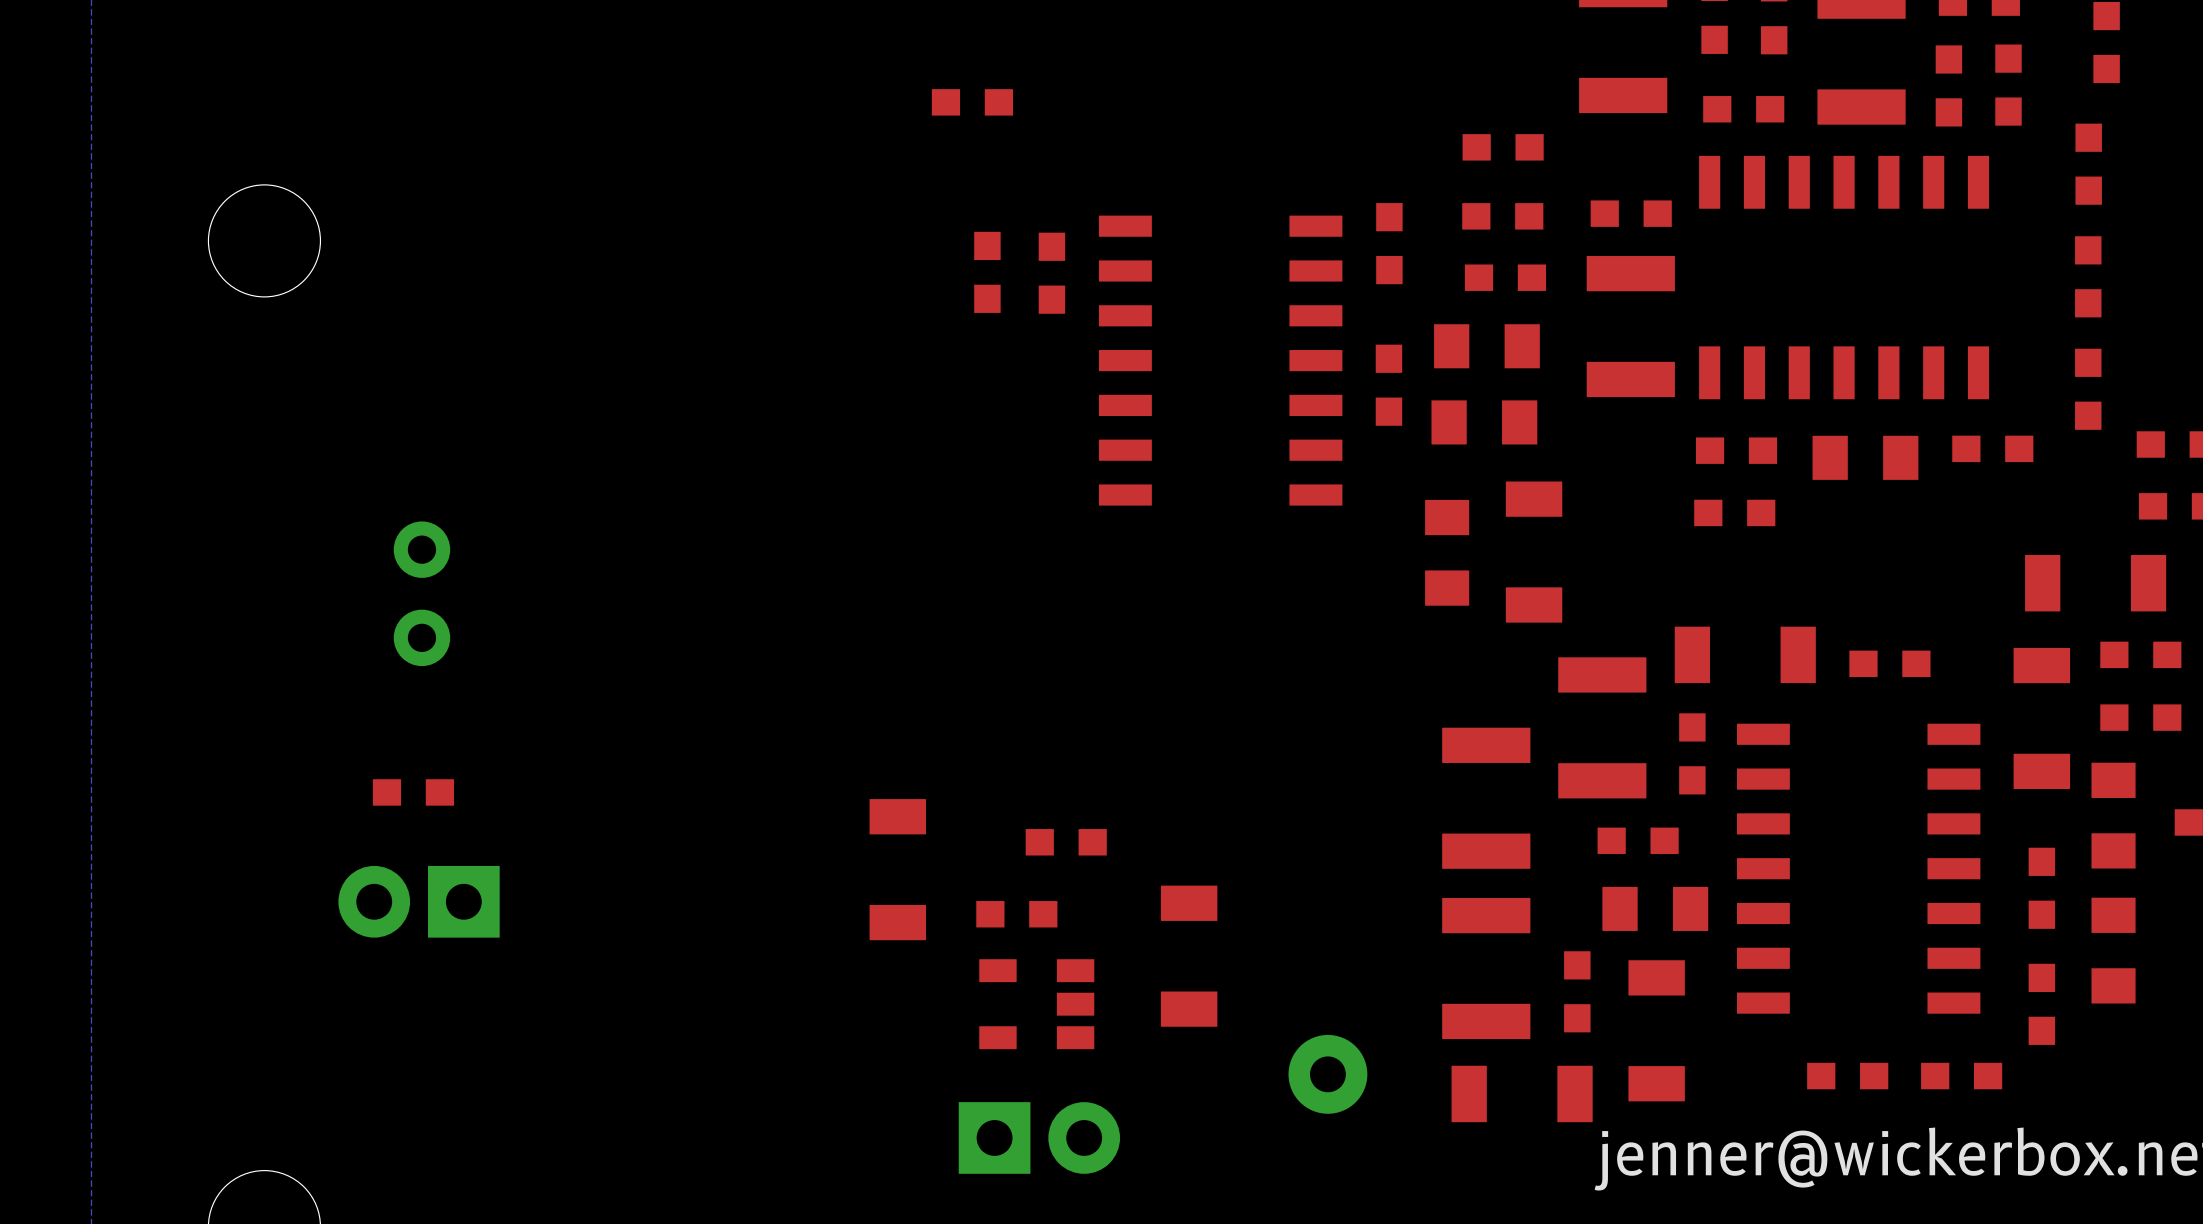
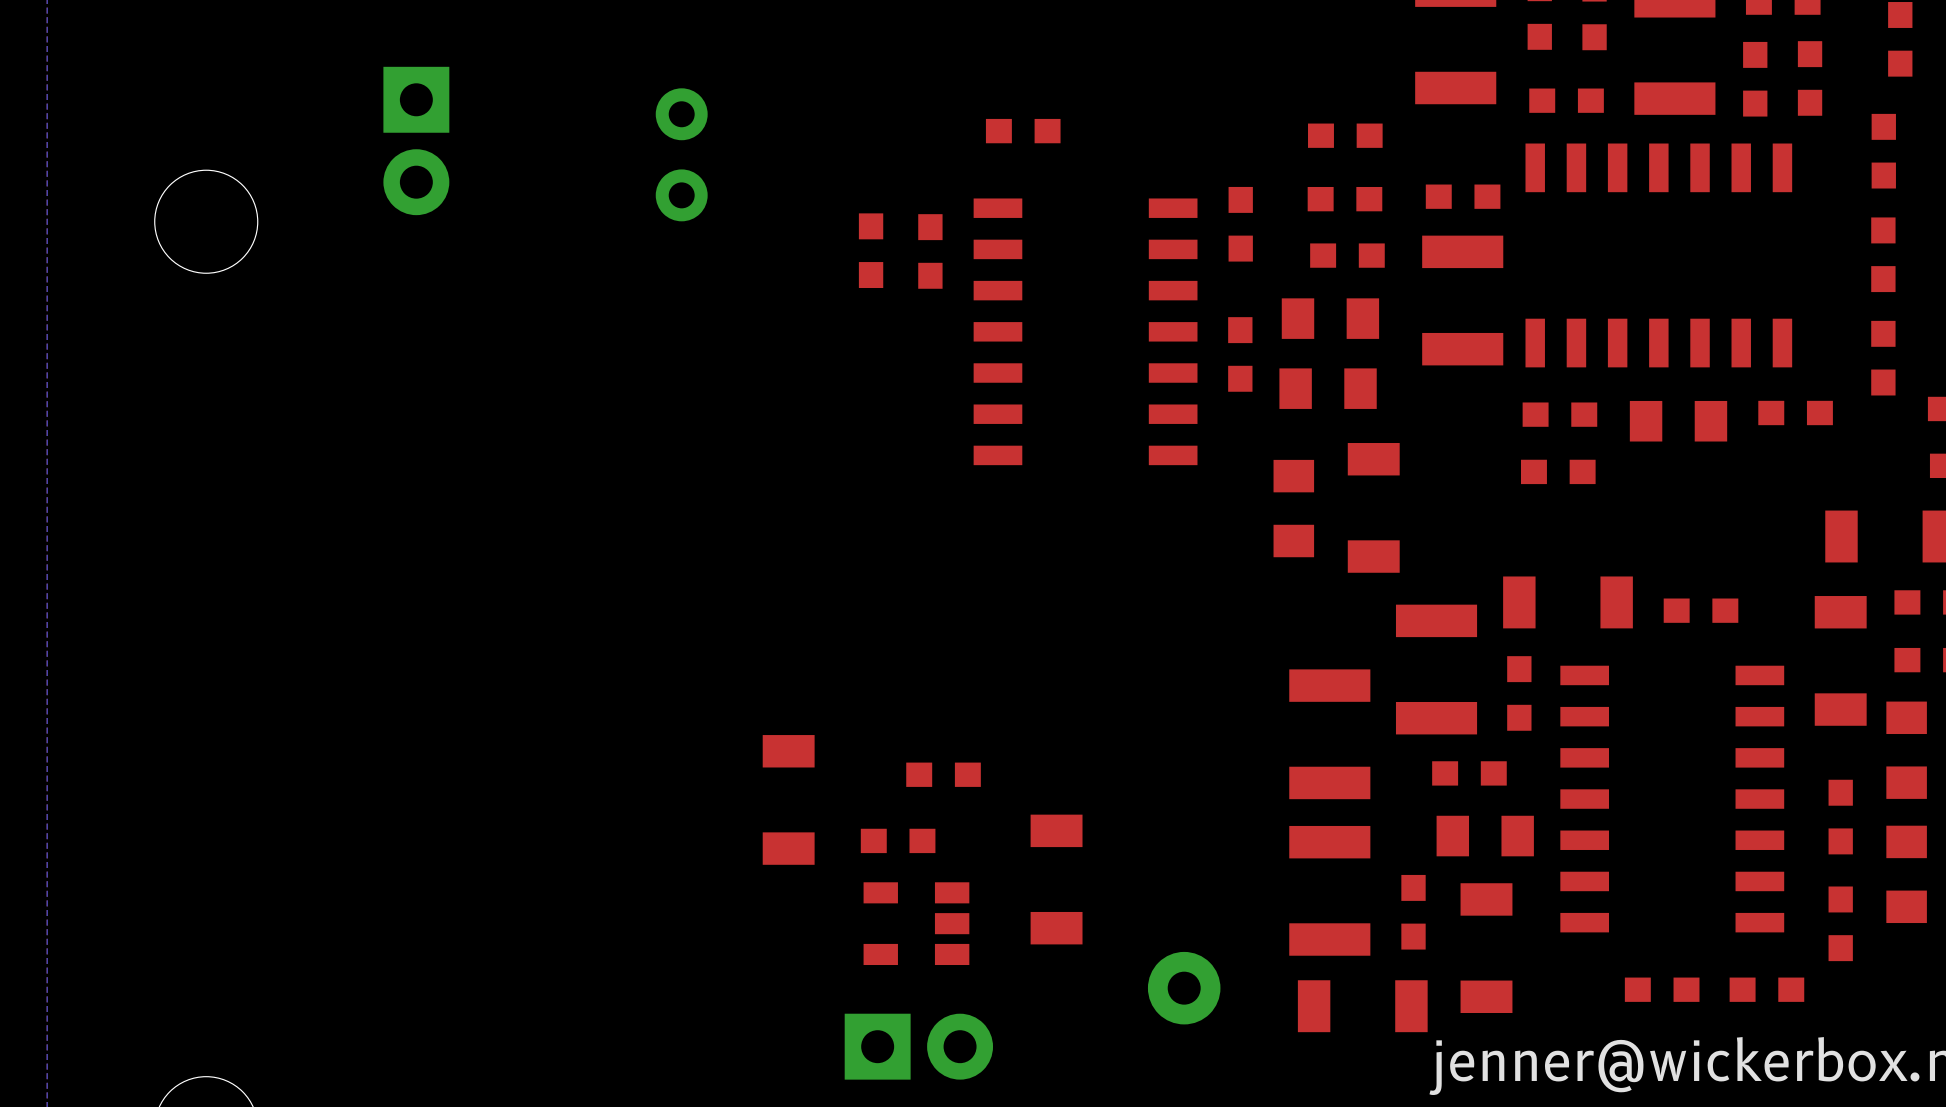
part: (972, 102) -> none
part: none -> (1023, 131)
part position: (421, 593) -> (681, 154)
part: (413, 792) -> none
part rotation: 0° (419, 901) -> 90° counterclockwise (416, 140)
part position: (419, 901) -> (416, 140)

